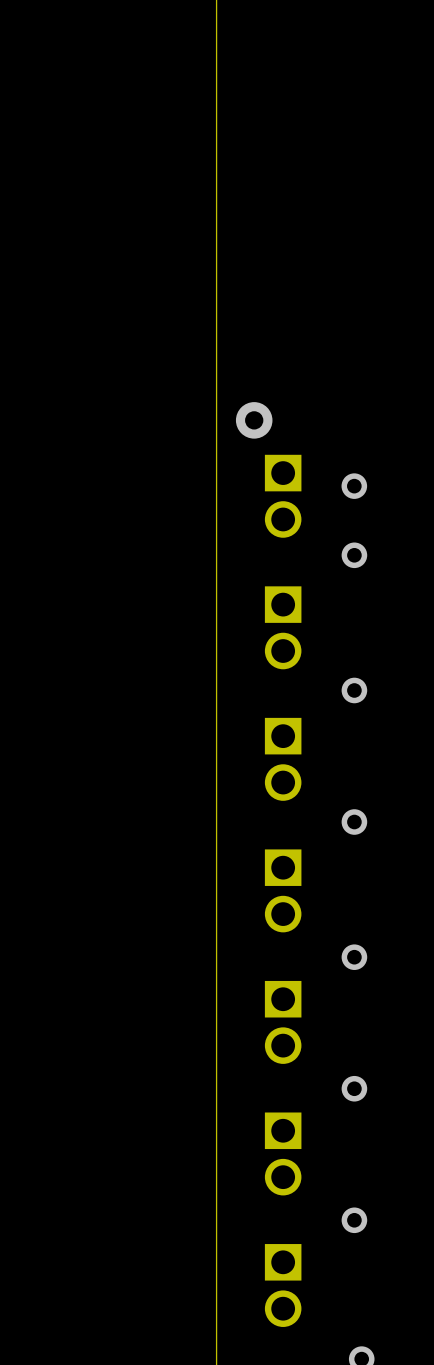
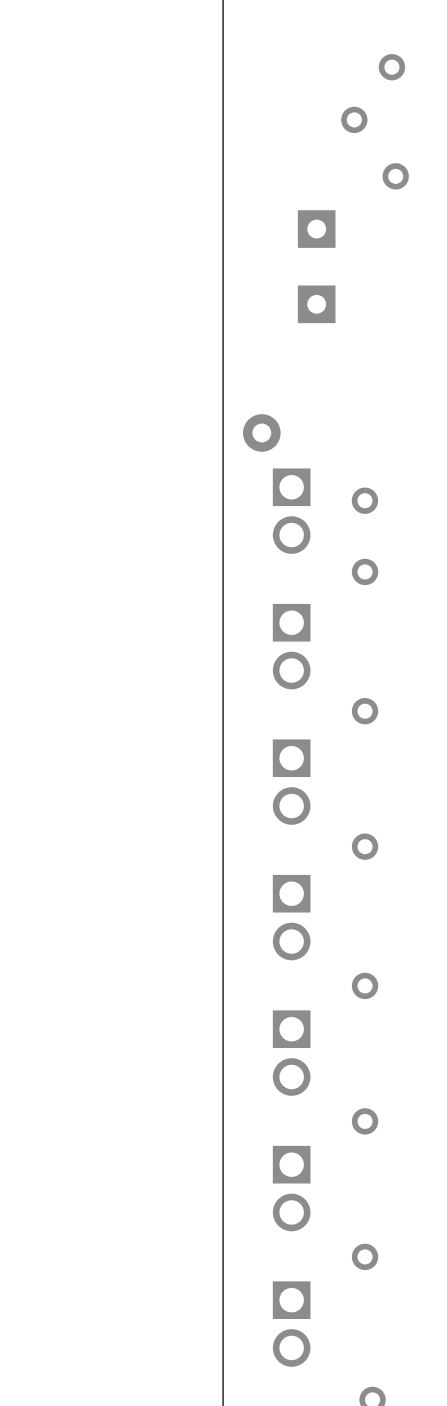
via: none -> (391, 67)
via: none -> (354, 119)
via: none -> (395, 176)
part: none -> (316, 229)
part: none -> (316, 304)

